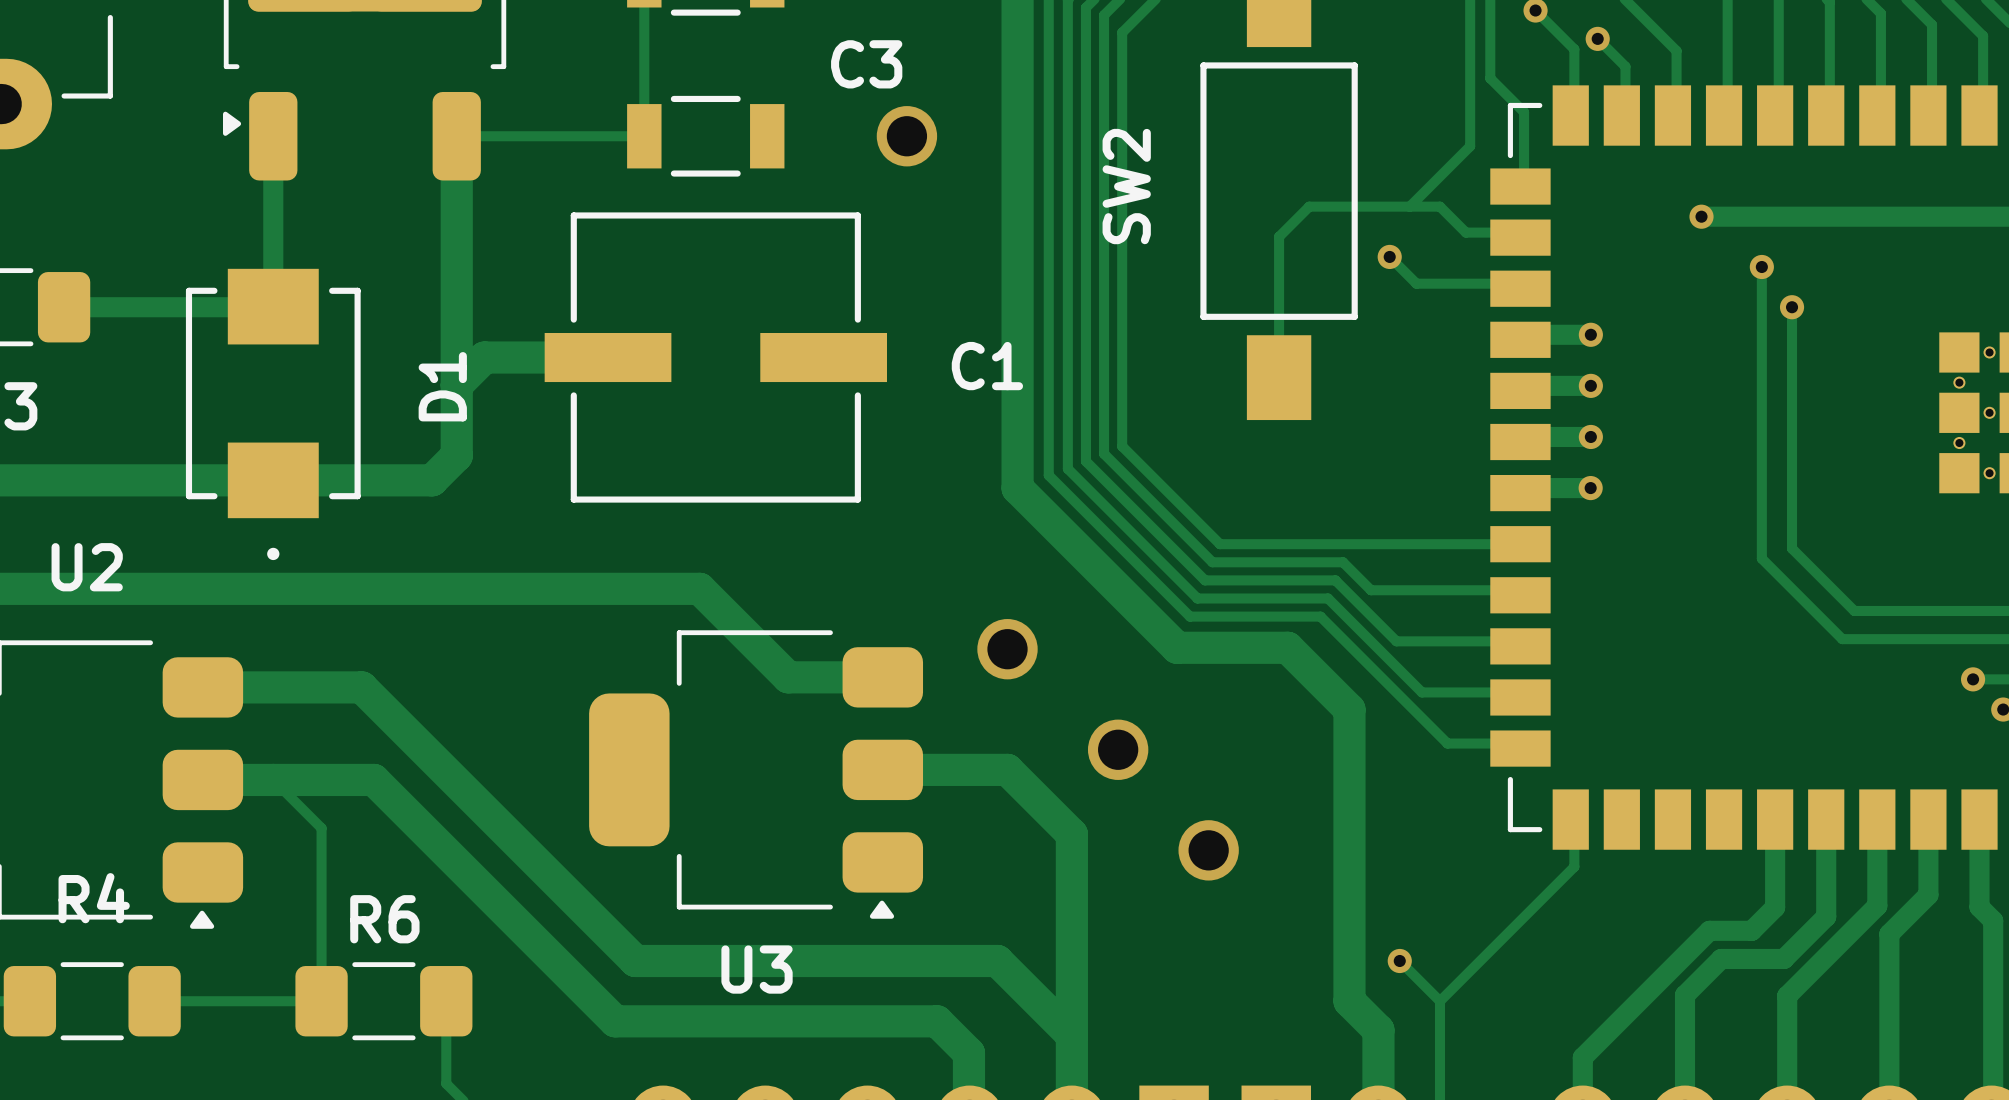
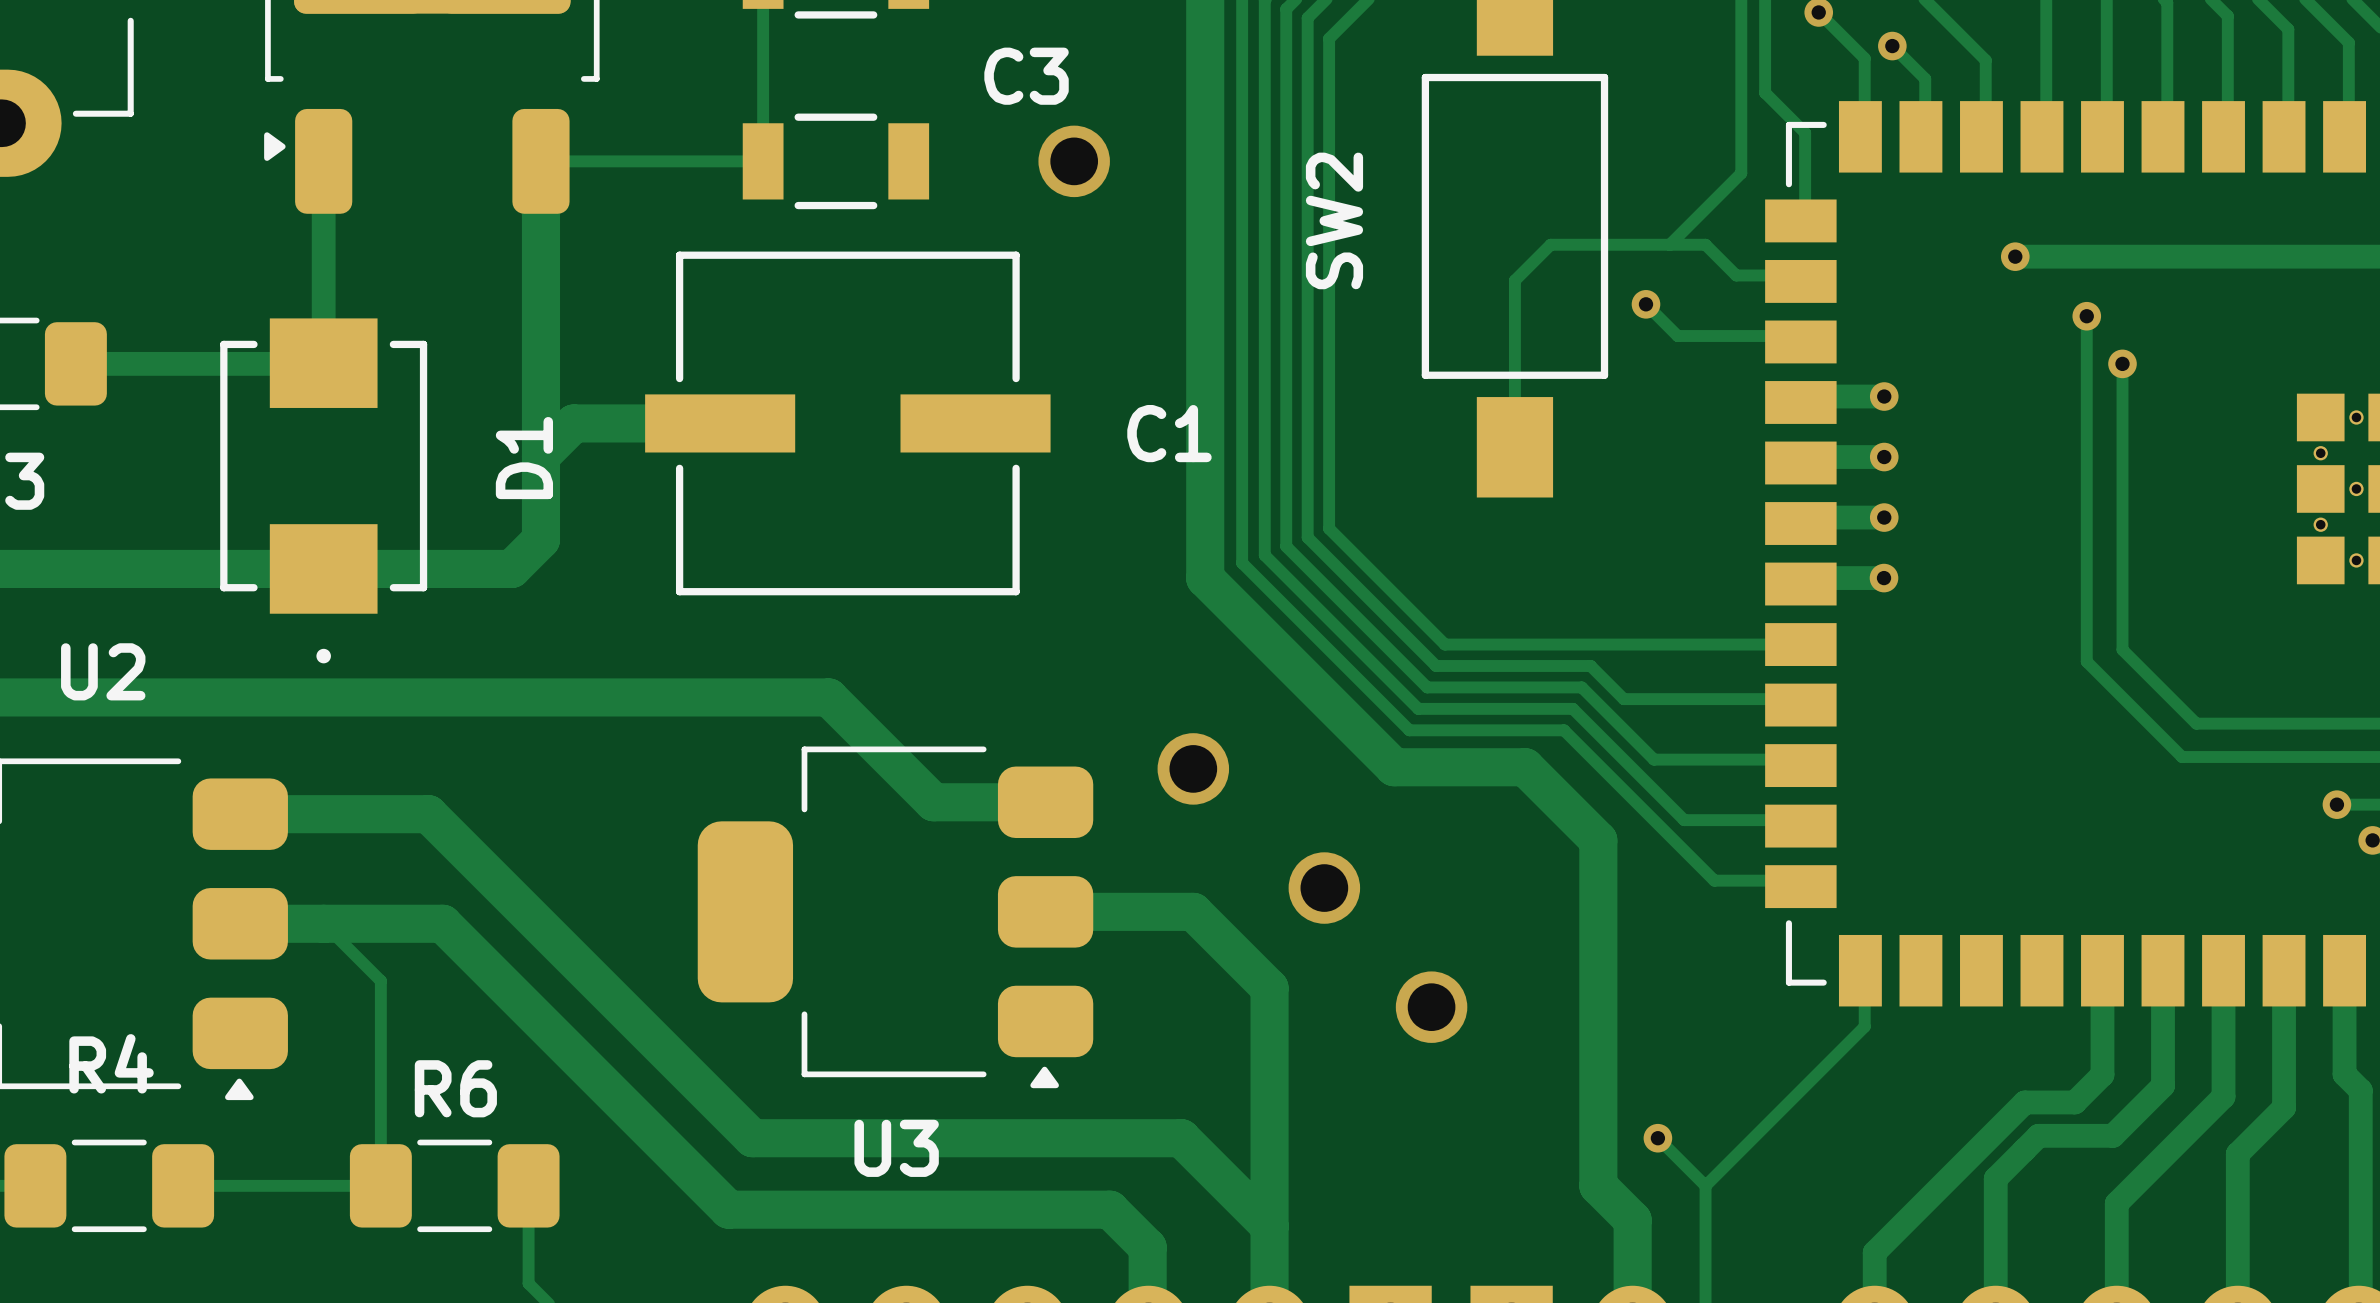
track: (1928, 895) (1889, 934) (1889, 974) -> (2284, 1060) (2284, 1107) (2237, 1153)
track: (1877, 905) (1787, 995) (1787, 1016) -> (2223, 1072) (2223, 1096) (2116, 1203)

